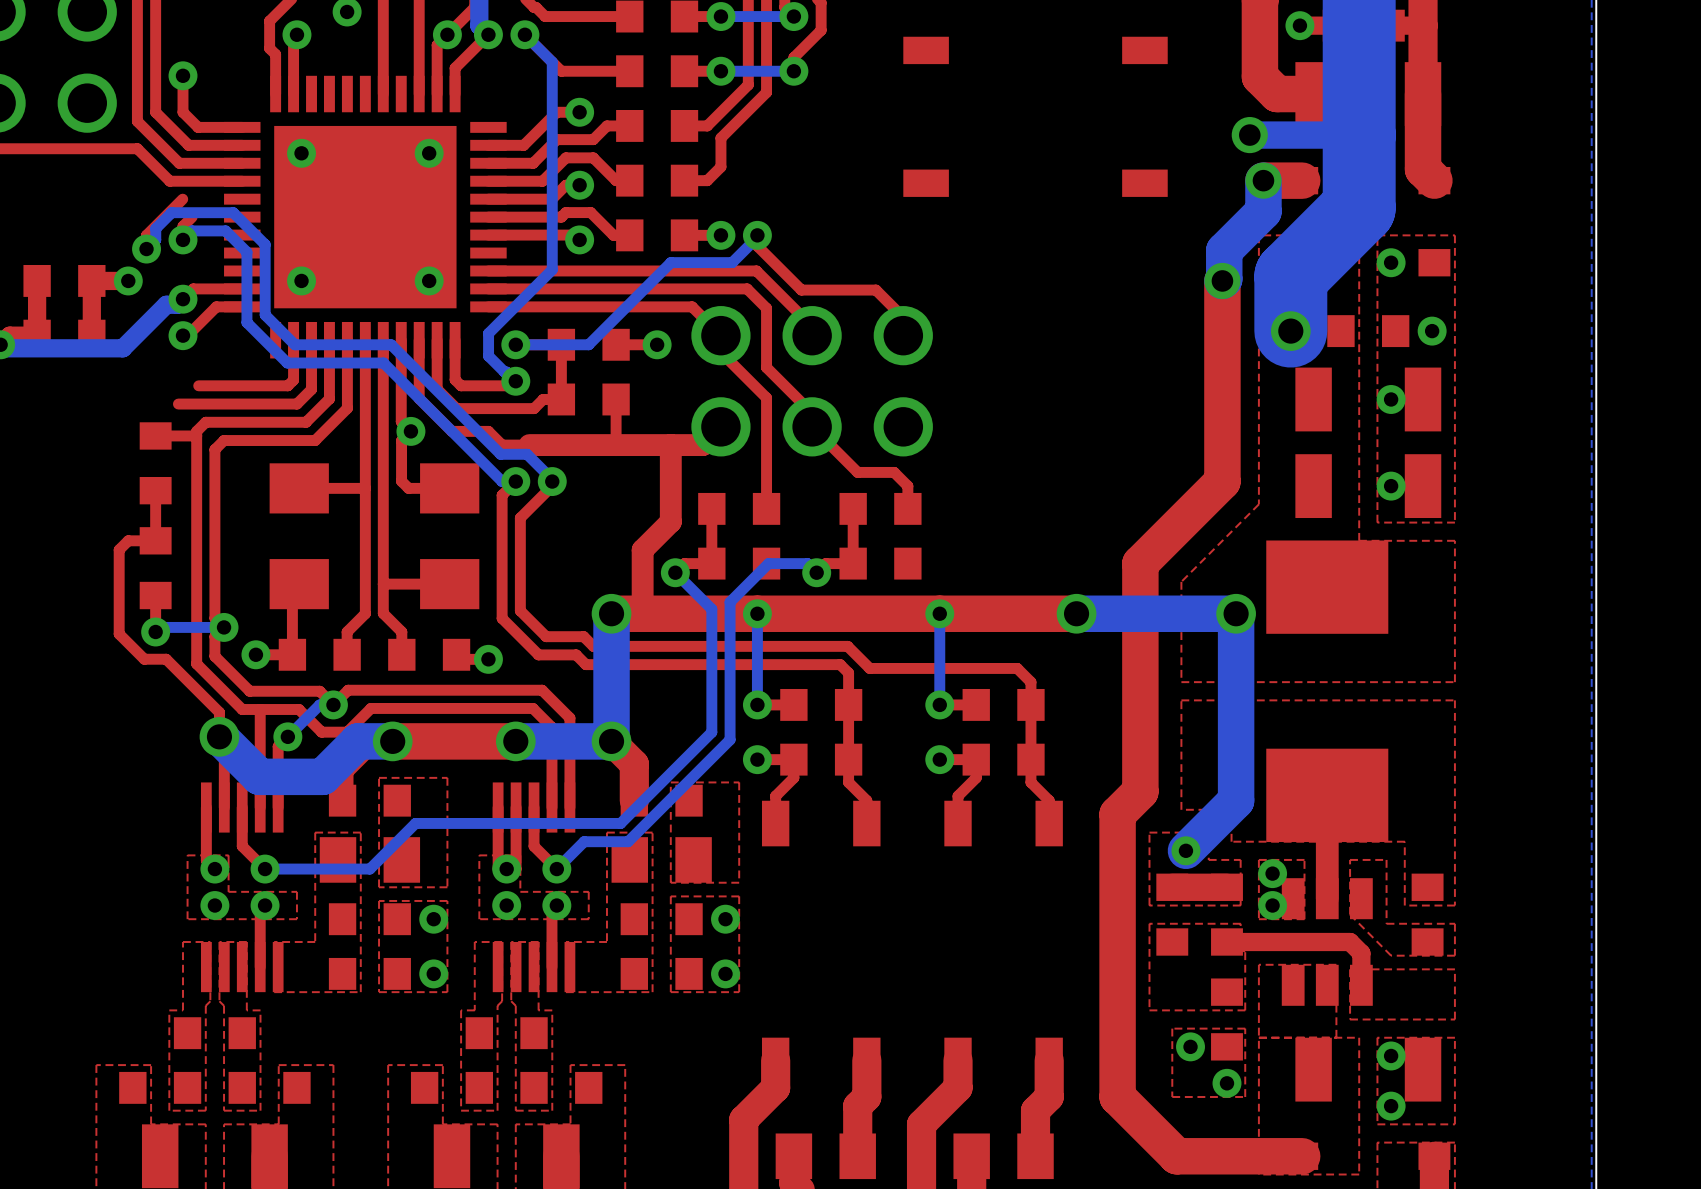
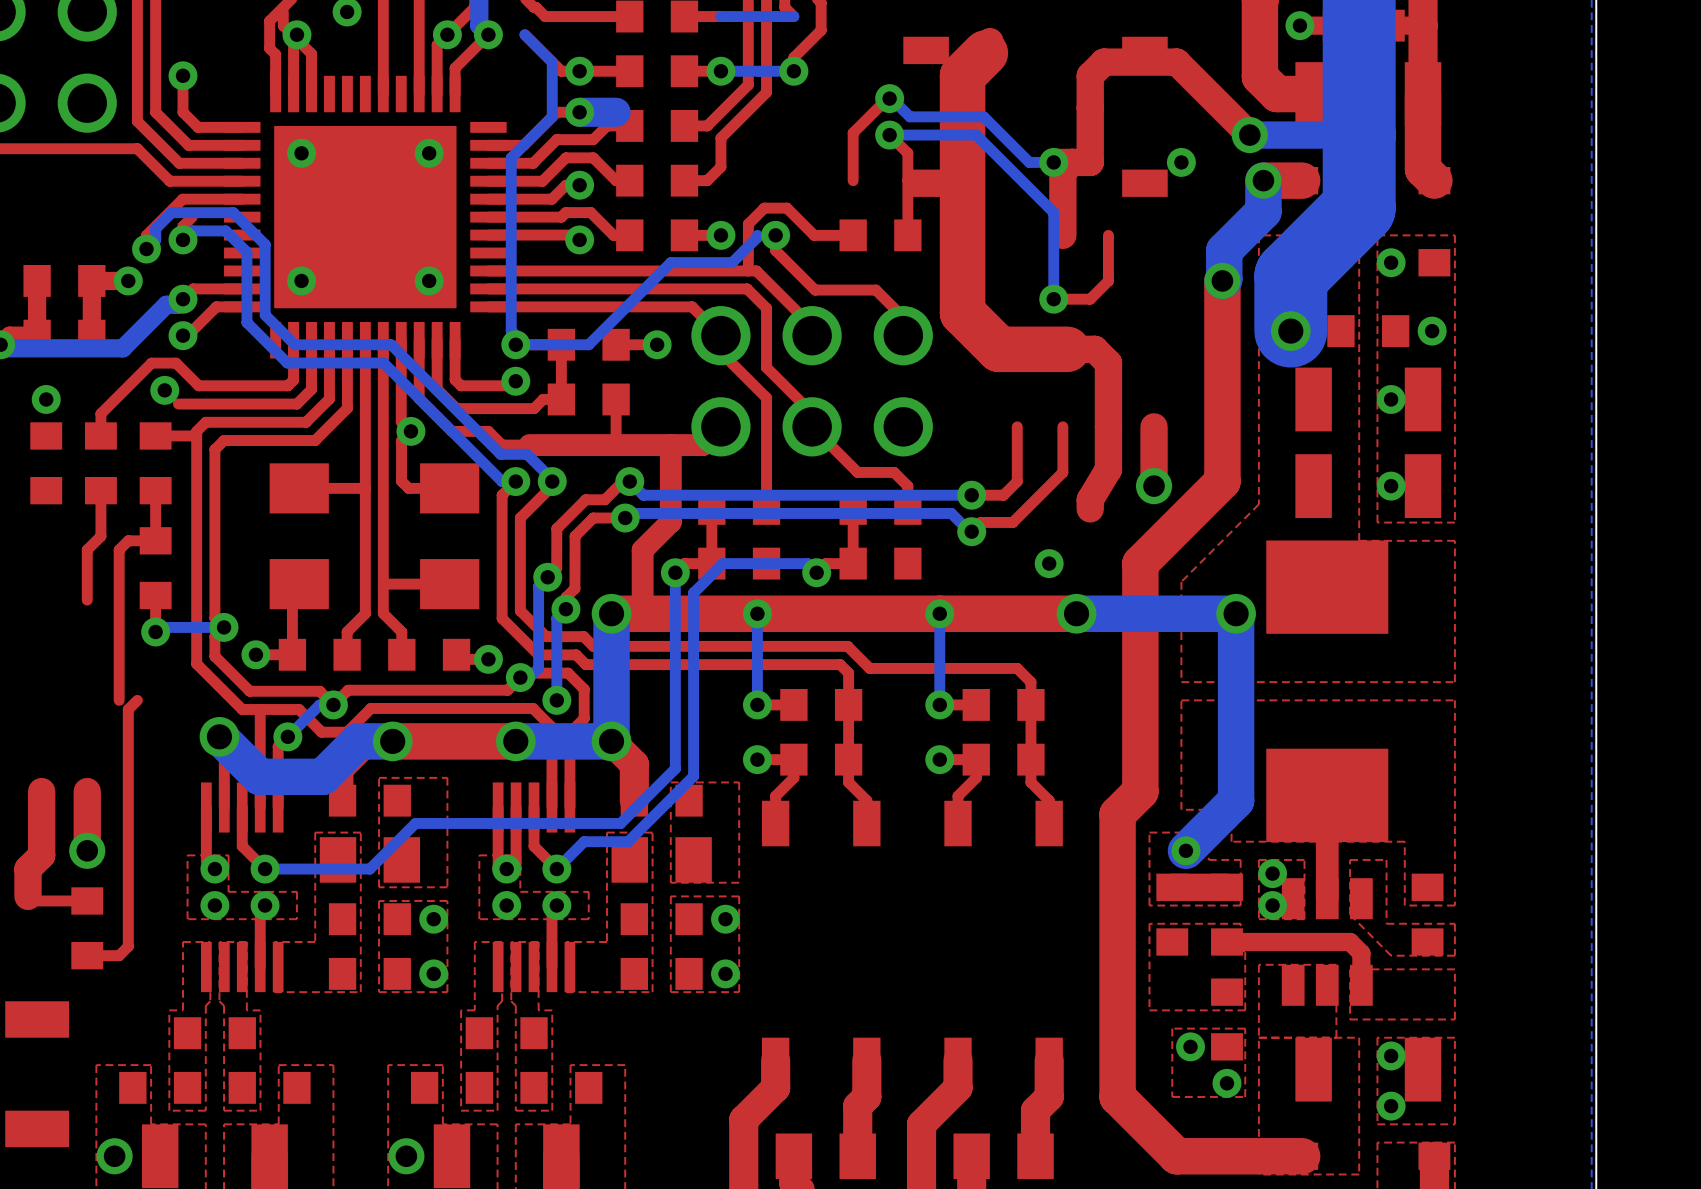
top track: none -> (283, 11) (283, 25) (311, 53) (311, 94)
via: (720, 16) -> none
via: (793, 16) -> none
via: (524, 34) -> none
top track: none -> (989, 41) (985, 53) (962, 75) (962, 312) (999, 349) (1094, 349) (1108, 363) (1108, 469) (1090, 499) (1090, 508)
via: none -> (579, 71)
top track: none -> (889, 98) (853, 133) (853, 180)
bottom track: none -> (889, 98) (909, 116) (983, 116) (1029, 162) (1053, 162)
via: none -> (889, 98)
bottom track: none -> (616, 112) (579, 112)
bottom track: (552, 116) (552, 269) (488, 333) (488, 356) (515, 381) -> (552, 116) (511, 157) (511, 331) (524, 344)
top track: none -> (889, 135) (907, 153) (907, 235)
bottom track: none -> (889, 135) (976, 135) (1053, 212) (1053, 299)
via: none -> (889, 135)
top track: none -> (1249, 135) (1176, 62) (1103, 62) (1090, 75) (1090, 162) (1053, 162)
via: none -> (1053, 162)
top track: none -> (1071, 162) (1062, 171) (1062, 235)
via: none -> (1181, 162)
top track: none -> (242, 199) (182, 199)
top track: (757, 235) (757, 246) (801, 290) (815, 290) -> (775, 235) (775, 250) (815, 290)
via position: (757, 235) -> (775, 235)
top track: none -> (853, 235) (814, 235) (786, 208) (764, 208) (748, 224) (748, 270)
part: none -> (880, 235)
top track: none -> (1108, 235) (1108, 280) (1090, 299) (1053, 299)
via: none -> (1053, 299)
top track: none -> (198, 385) (176, 363) (151, 363) (100, 413) (100, 435)
via: none -> (164, 390)
via: none -> (46, 399)
top track: none -> (1017, 426) (1017, 481) (1003, 495) (971, 495)
top track: none -> (1062, 426) (1062, 472) (1012, 522) (980, 522) (971, 531)
top track: none -> (1154, 426) (1154, 486)
part: none -> (46, 463)
part: none -> (100, 463)
top track: none -> (629, 481) (623, 481) (604, 499) (585, 499) (556, 528) (556, 568) (547, 577)
bottom track: none -> (629, 481) (643, 495) (971, 495)
via: none -> (629, 481)
via: none -> (1154, 486)
top track: none -> (100, 490) (100, 536) (87, 549) (87, 600)
via: none -> (971, 495)
top track: none -> (625, 518) (593, 518) (575, 536) (574, 588) (565, 597) (565, 609)
bottom track: none -> (625, 518) (629, 513) (951, 513) (971, 531)
via: none -> (625, 518)
via: none -> (971, 531)
bottom track: (768, 563) (730, 602) (730, 739) (693, 776) -> (768, 563) (723, 563) (693, 593) (693, 776)
via: none -> (1049, 563)
bottom track: (675, 572) (711, 609) (711, 732) (675, 768) -> (675, 572) (675, 768)
bottom track: none -> (547, 577) (538, 586) (538, 668) (529, 677) (520, 677)
via: none -> (547, 577)
bottom track: none -> (565, 609) (556, 618) (556, 700)
via: none -> (565, 609)
top track: (119, 634) (144, 659) (166, 659) (219, 712) (219, 736) -> (119, 634) (119, 700)
via: none -> (520, 677)
top track: (507, 690) (542, 690) (569, 718) (569, 732) -> (507, 690) (524, 673) (568, 673) (584, 689) (584, 718) (569, 732)
top track: none -> (137, 700) (128, 709) (128, 946) (119, 955) (87, 955)
via: none -> (556, 700)
top track: none -> (41, 791) (41, 855) (28, 869) (28, 896) (32, 900) (87, 900)
top track: none -> (87, 791) (87, 850)
via: none -> (87, 850)
part: none -> (87, 928)
part: none -> (37, 1074)
via: none -> (114, 1156)
via: none -> (406, 1156)

